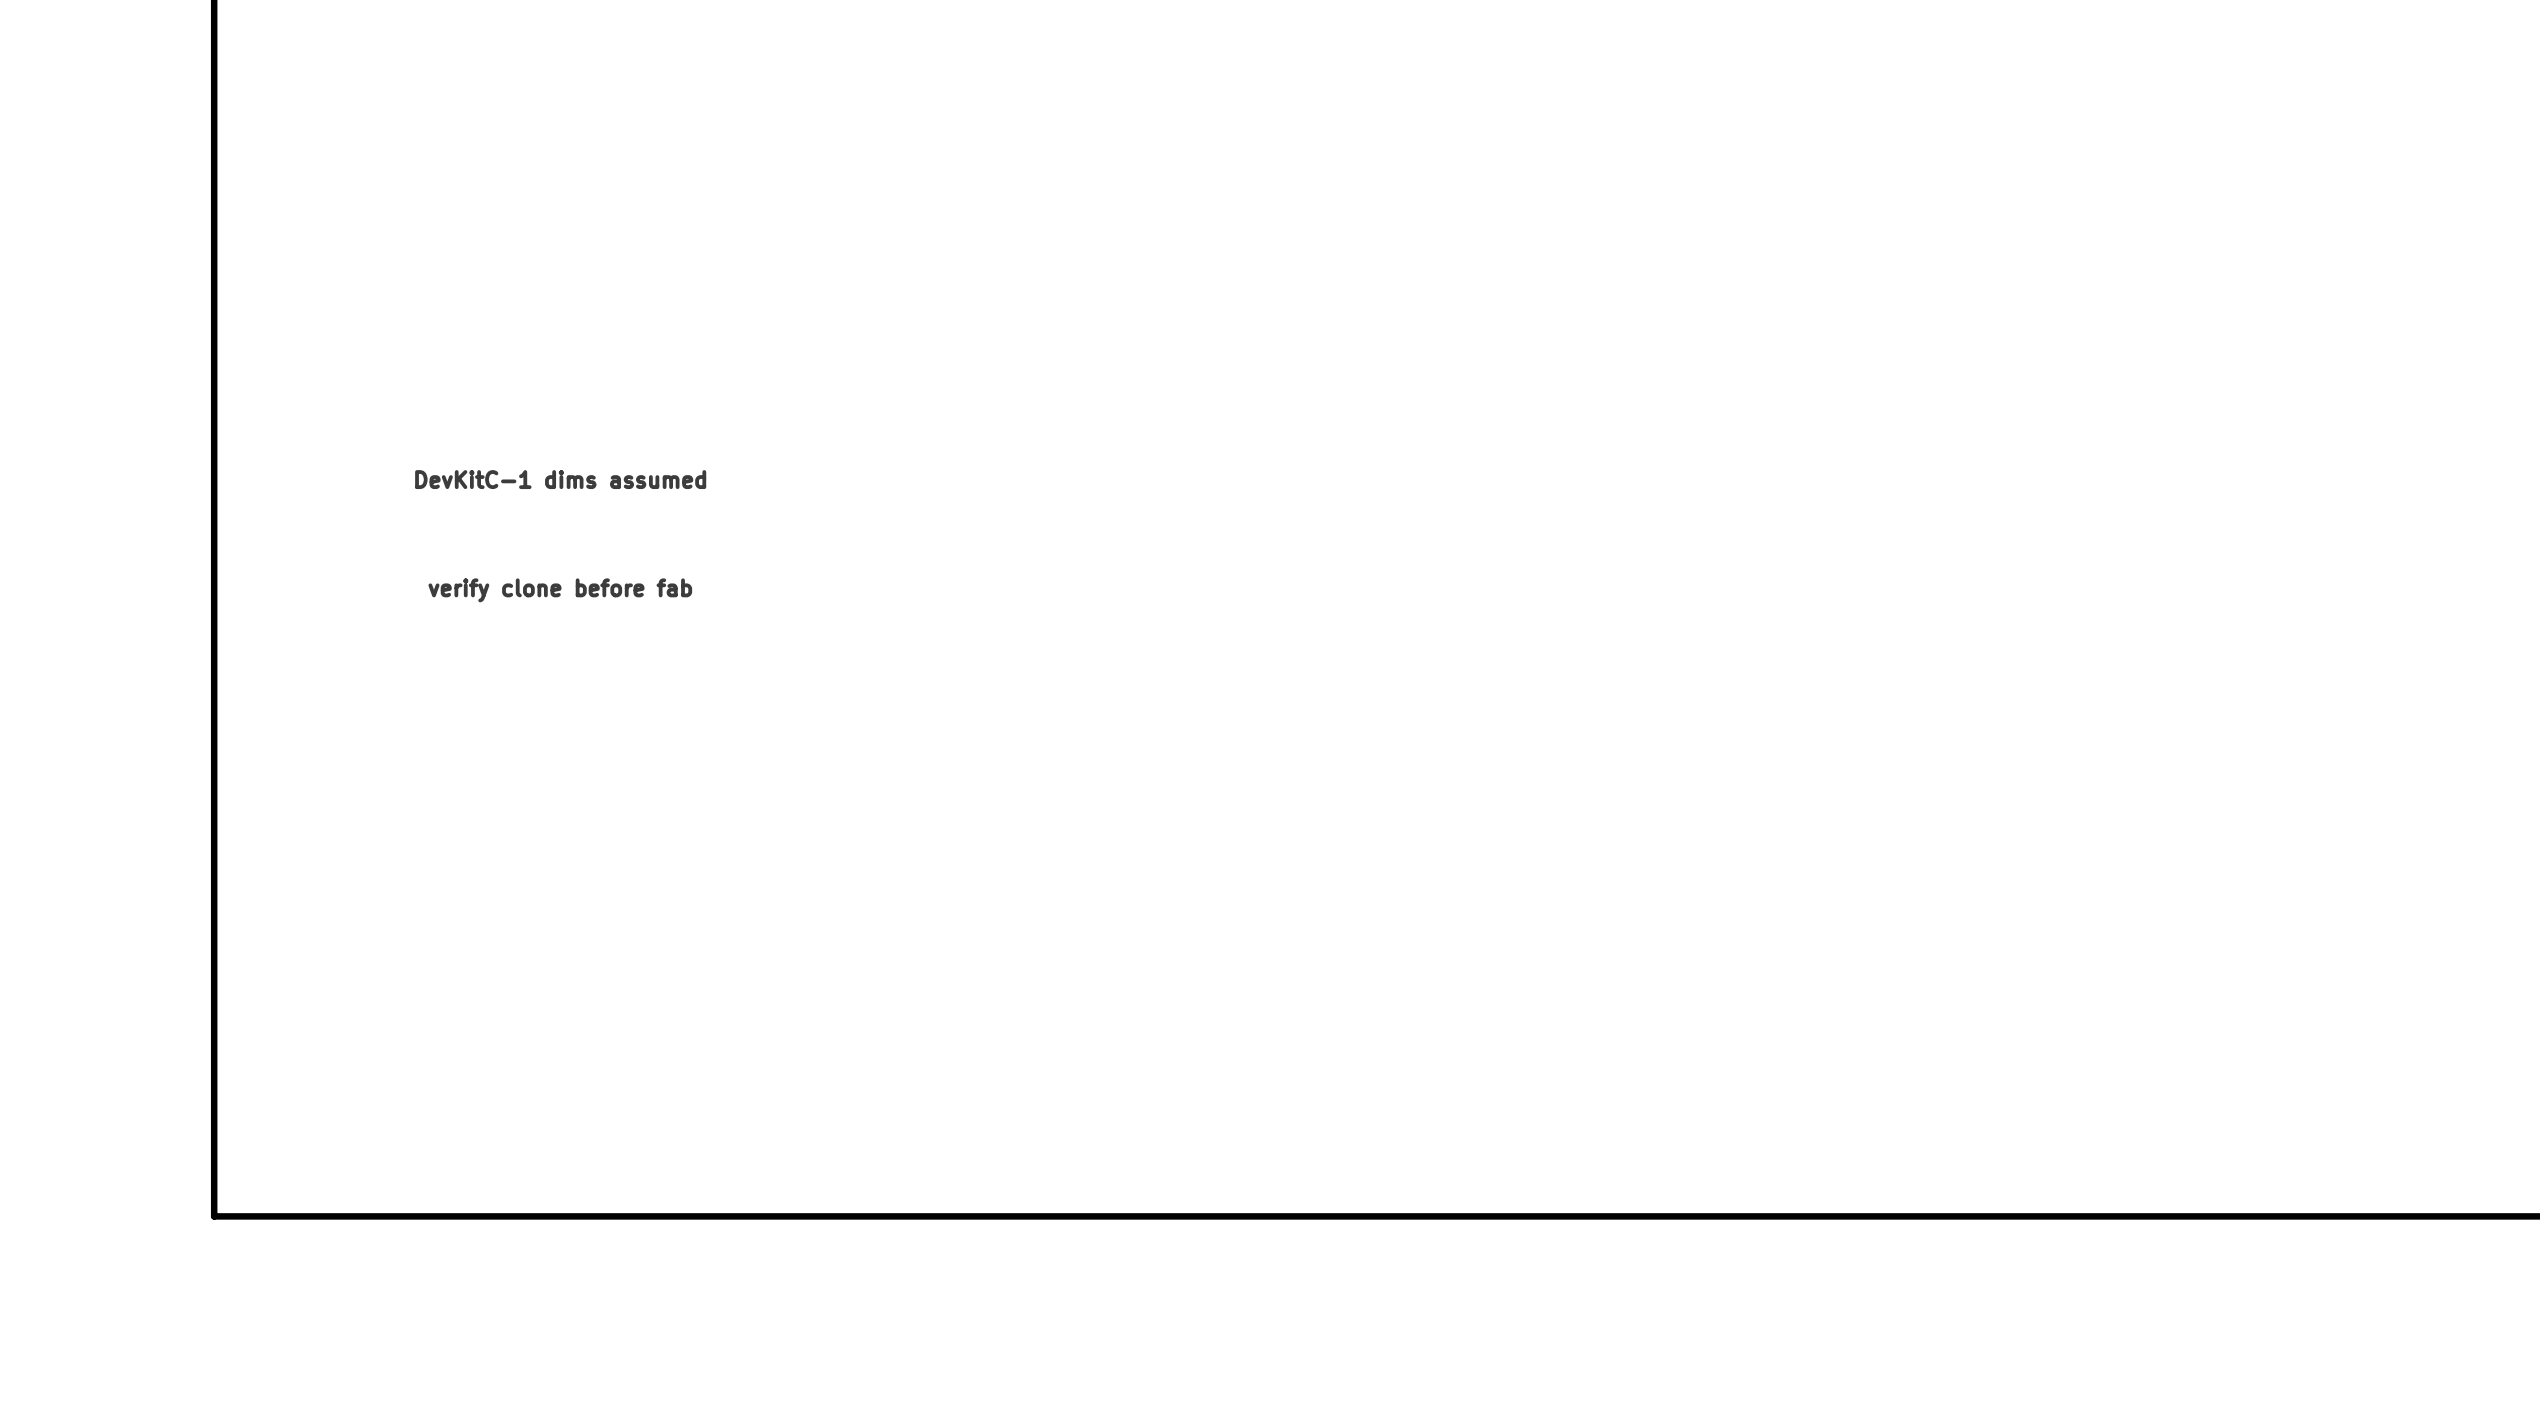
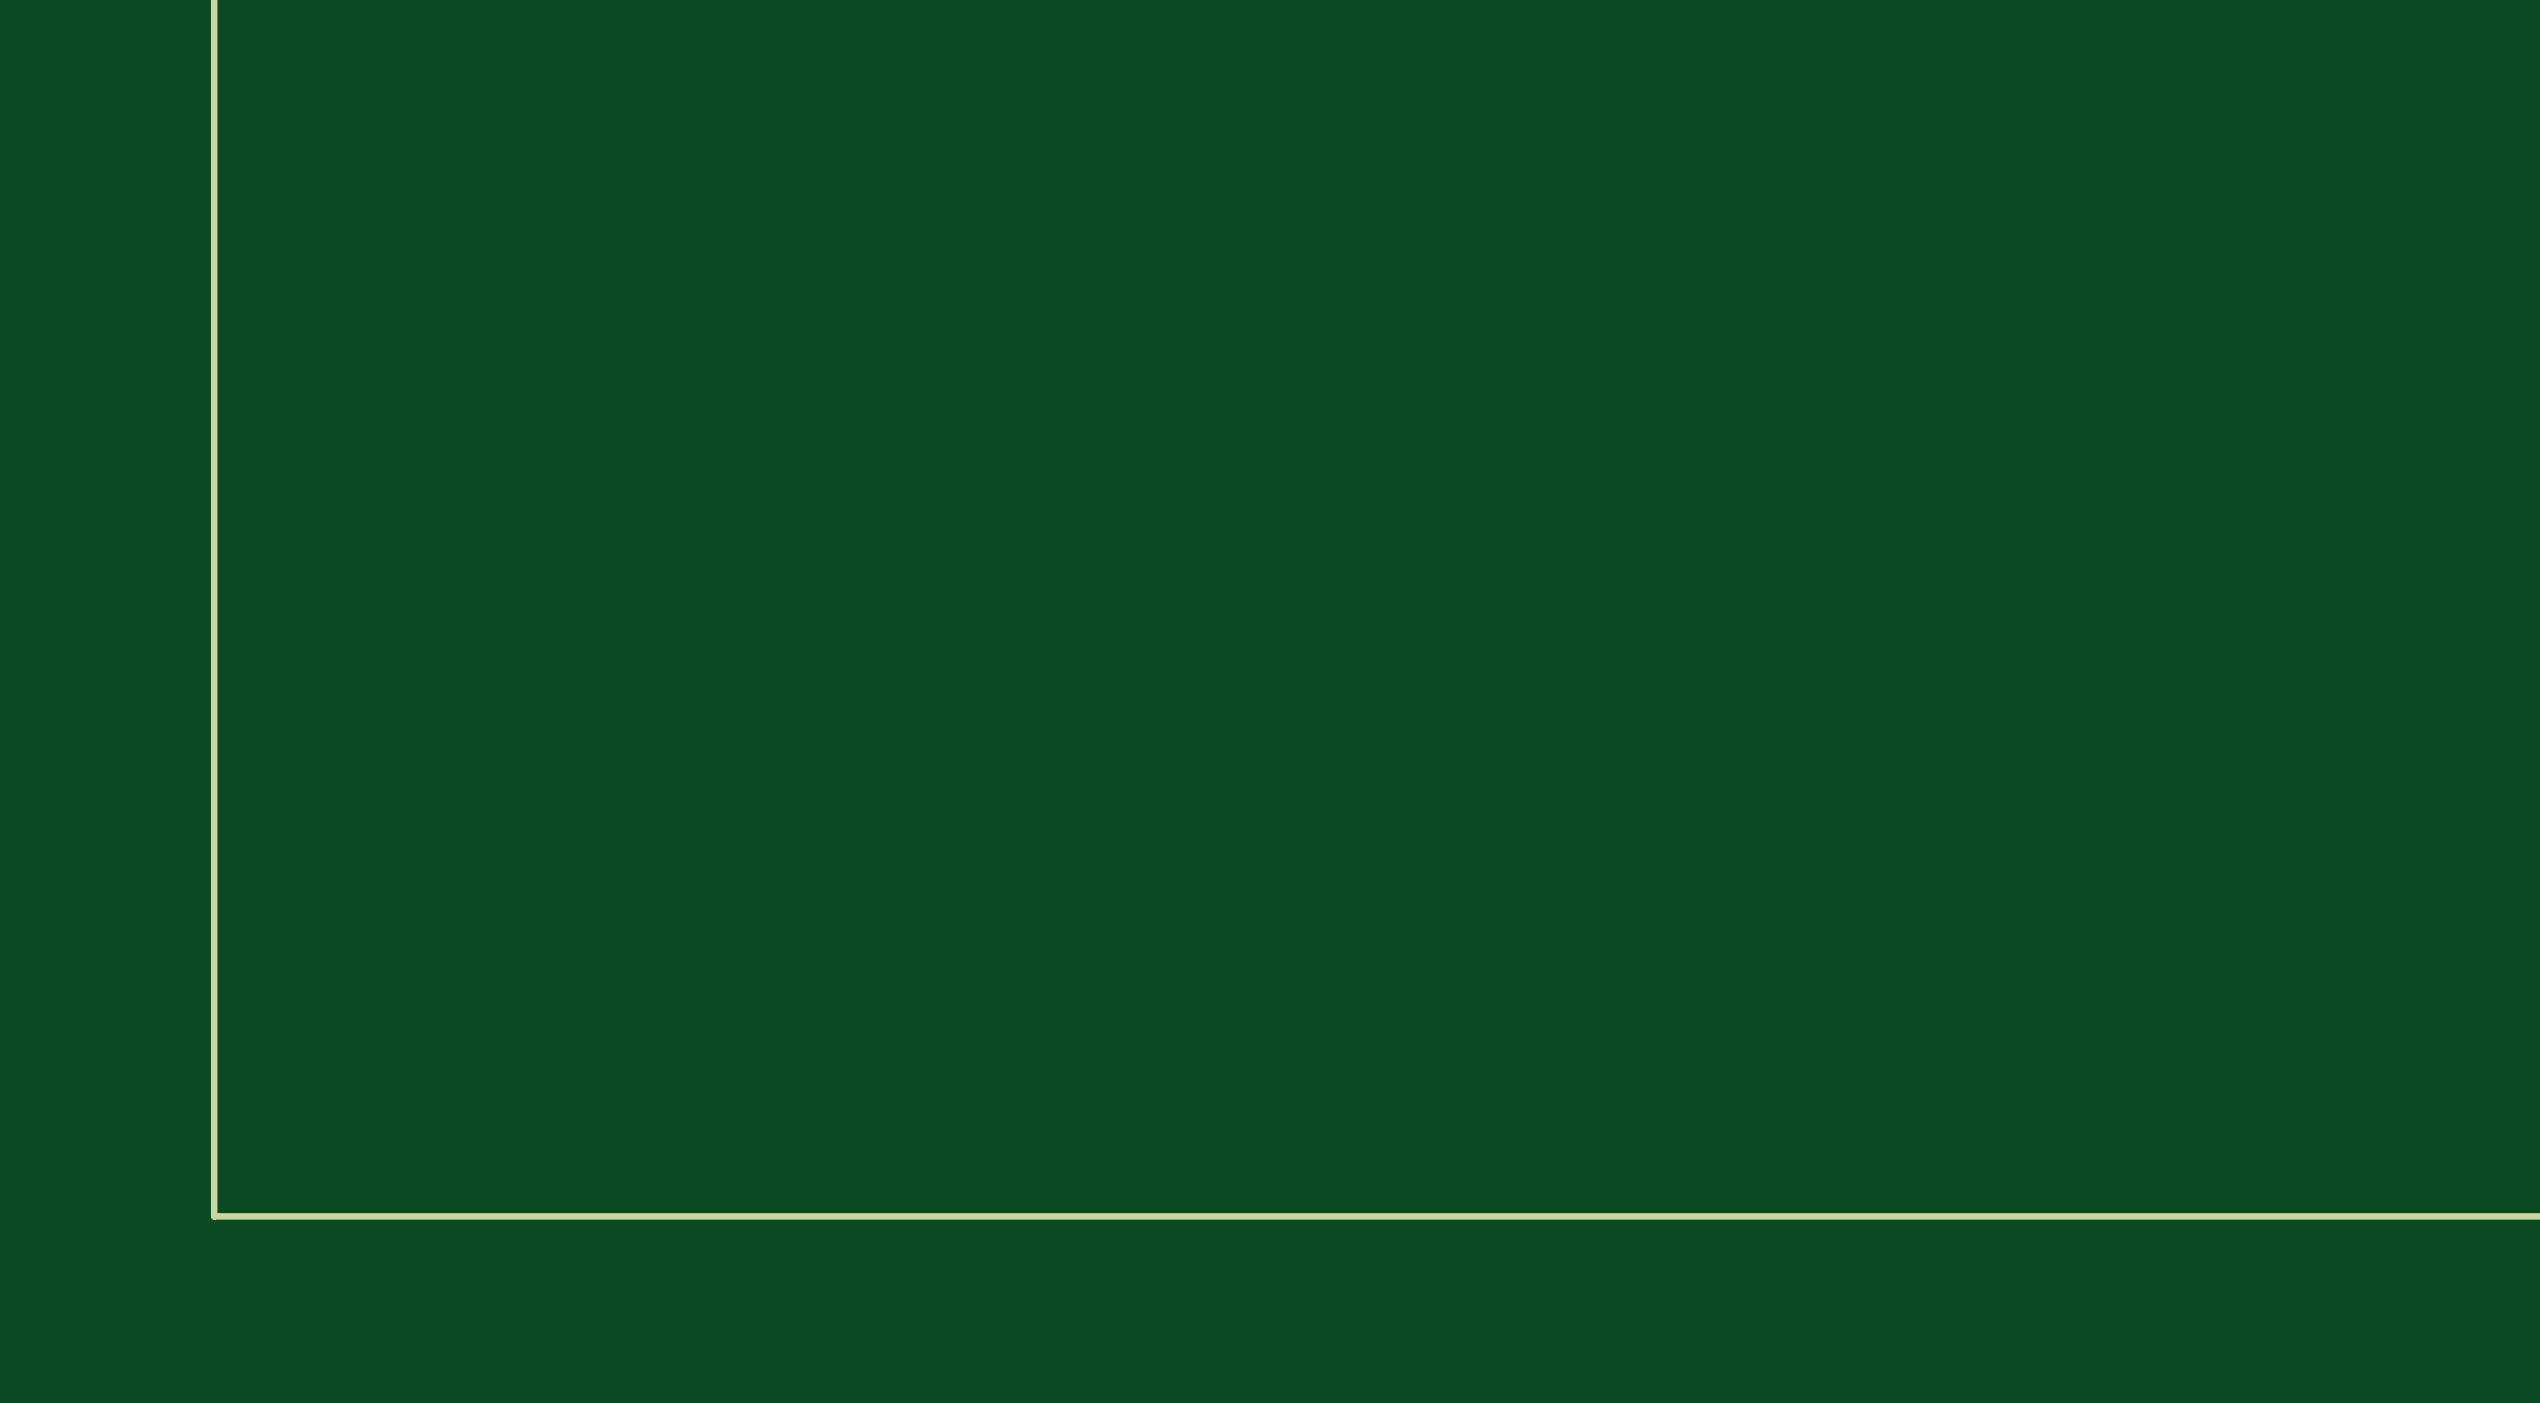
text: DevKitC-1 dims assumed (560, 479) -> none
text: verify clone before fab (560, 590) -> none

